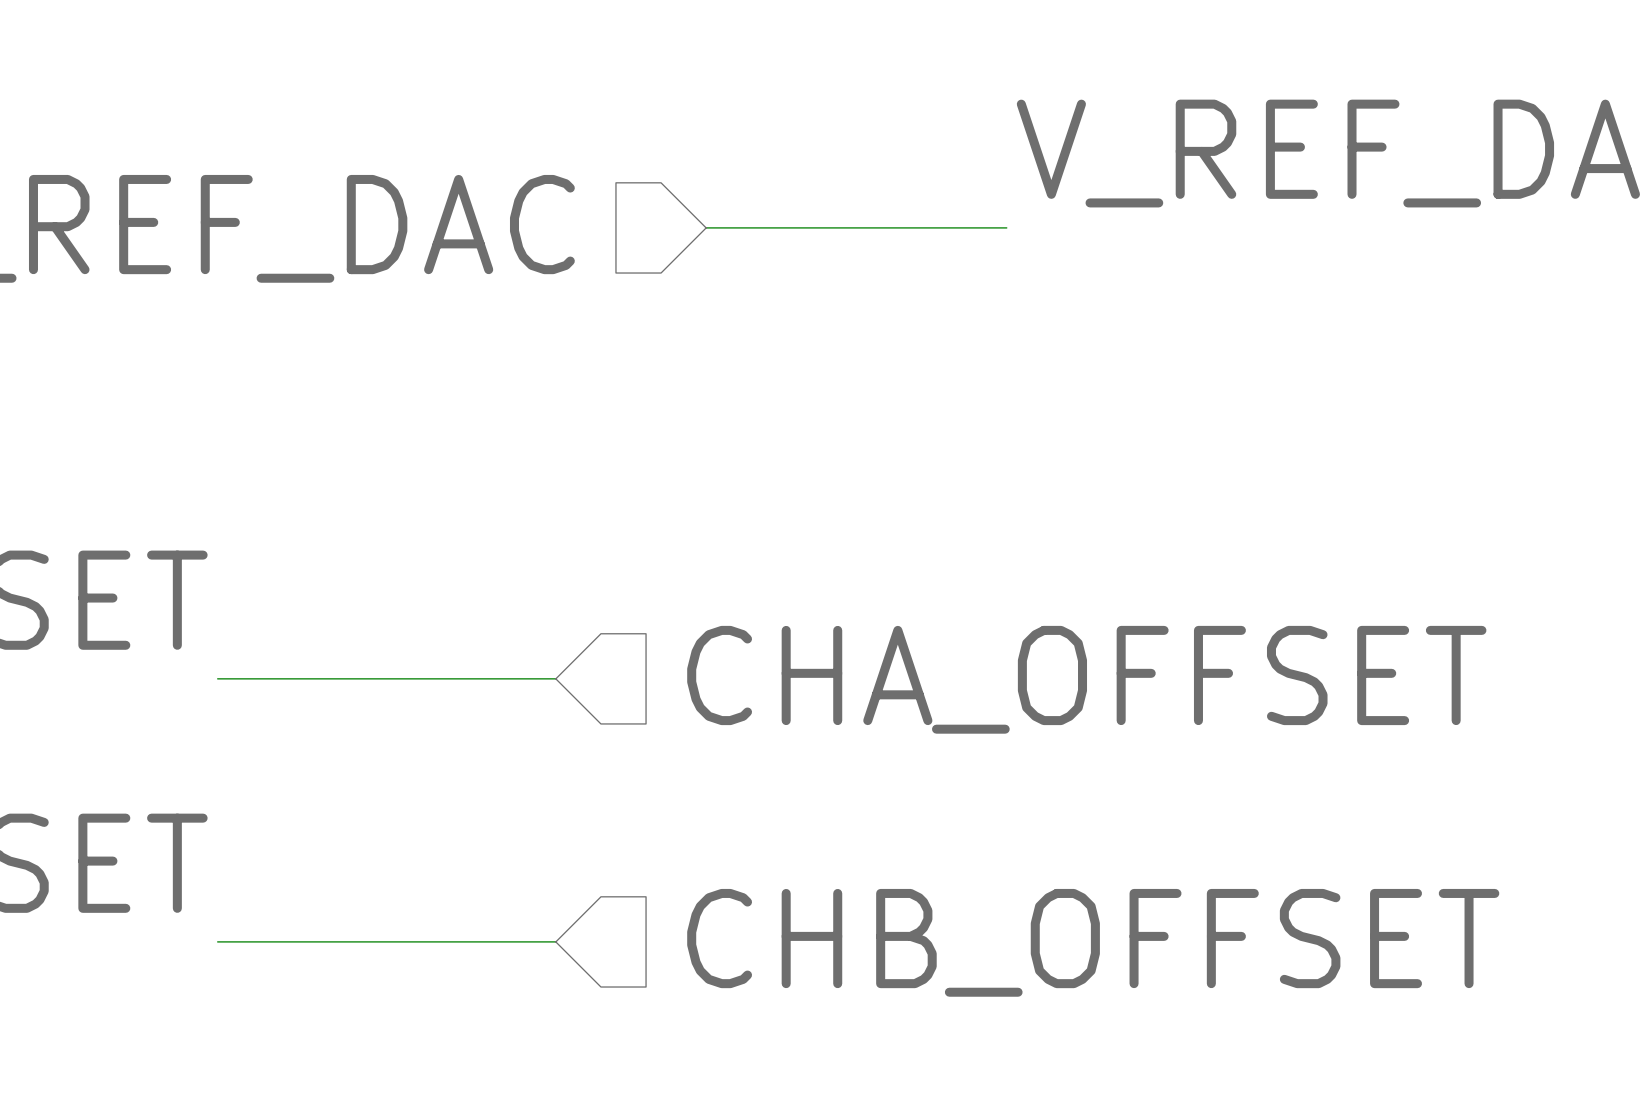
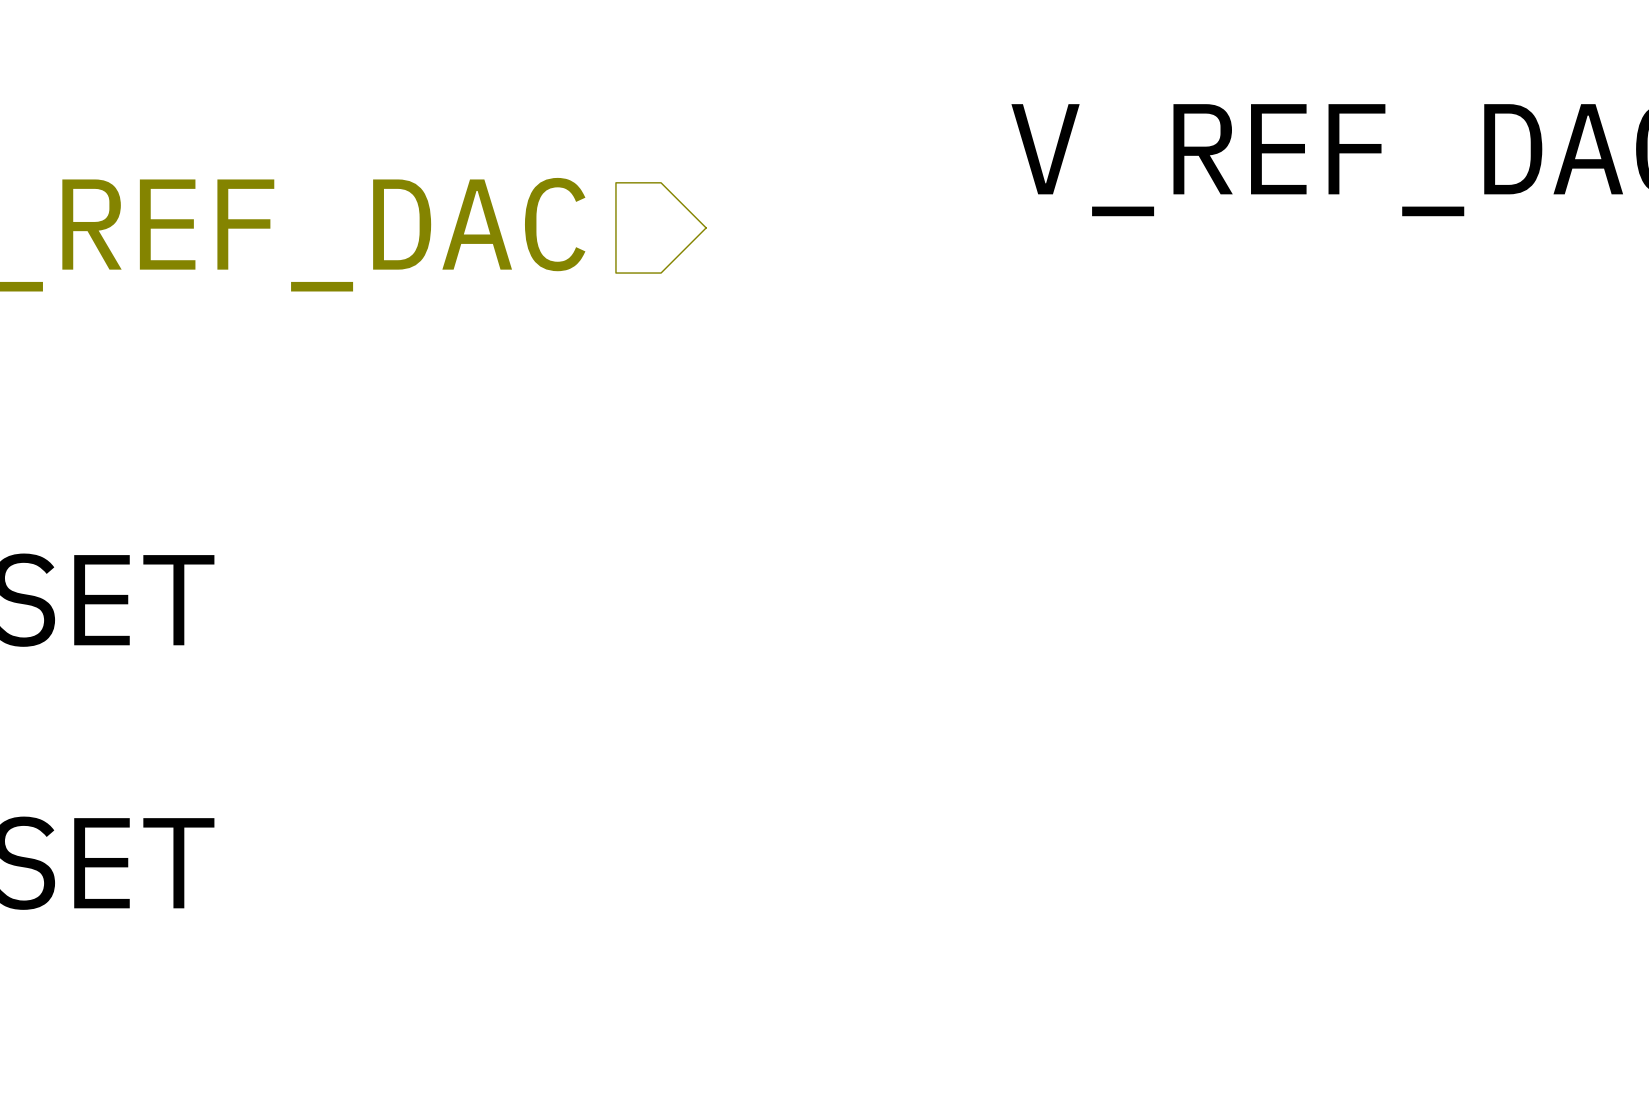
wire: (706, 227) (1006, 227) -> none
wire: (217, 678) (555, 678) -> none
hierarchical label: CHA_OFFSET (1086, 679) -> none
wire: (217, 941) (555, 941) -> none
hierarchical label: CHB_OFFSET (1093, 942) -> none

